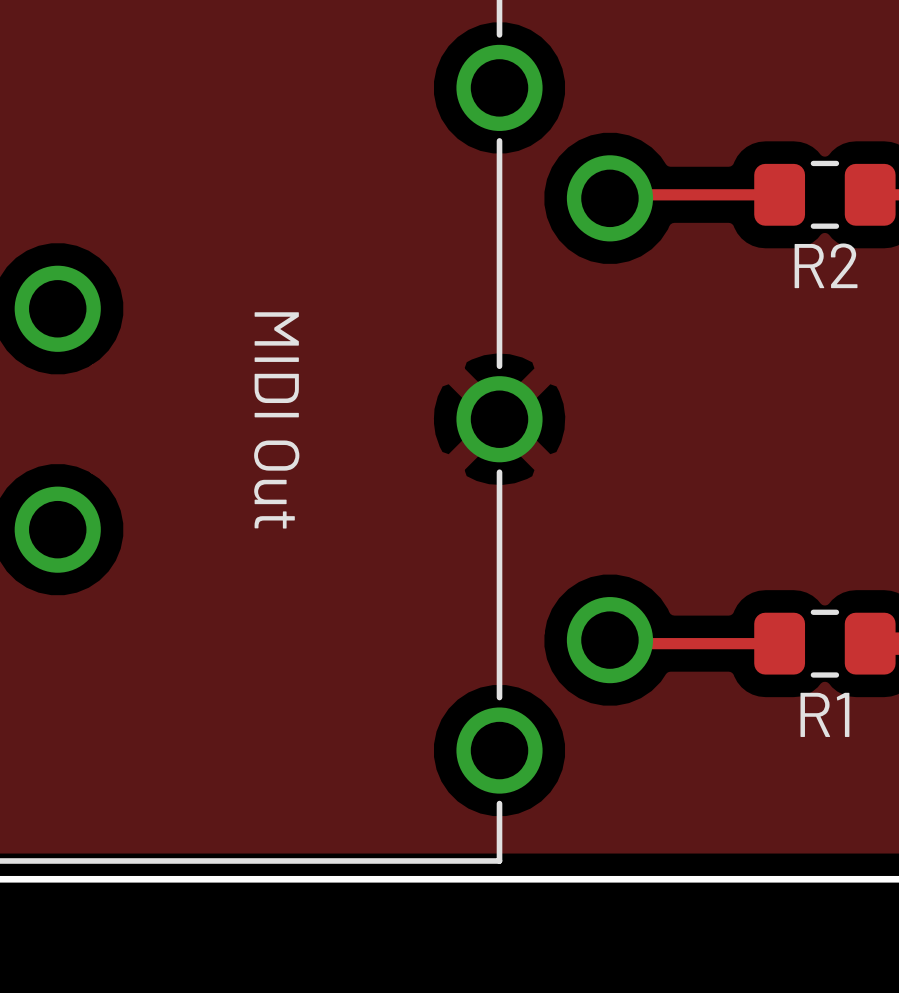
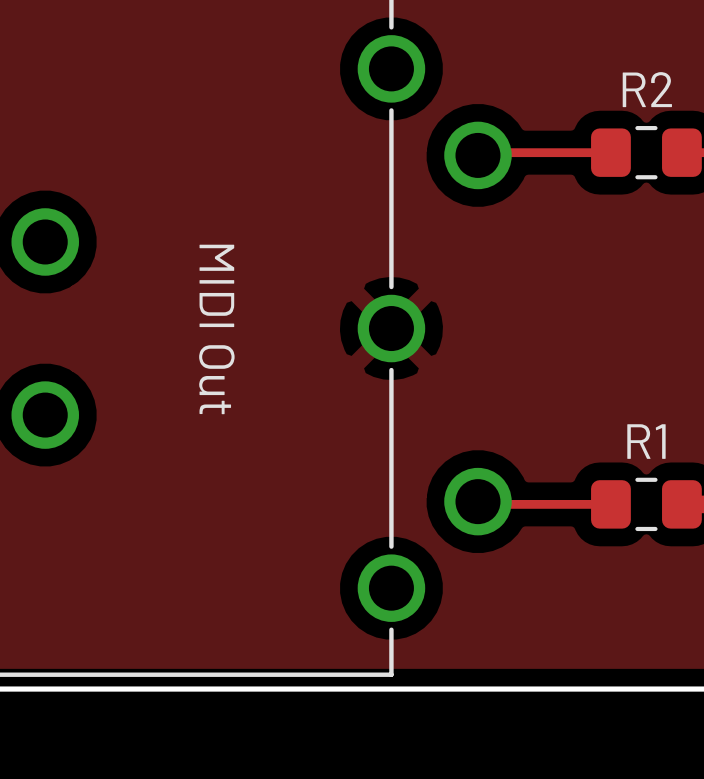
R2 name position: R2 (826, 265) -> R2 (647, 89)
R1 name position: R1 (824, 714) -> R1 (646, 441)

